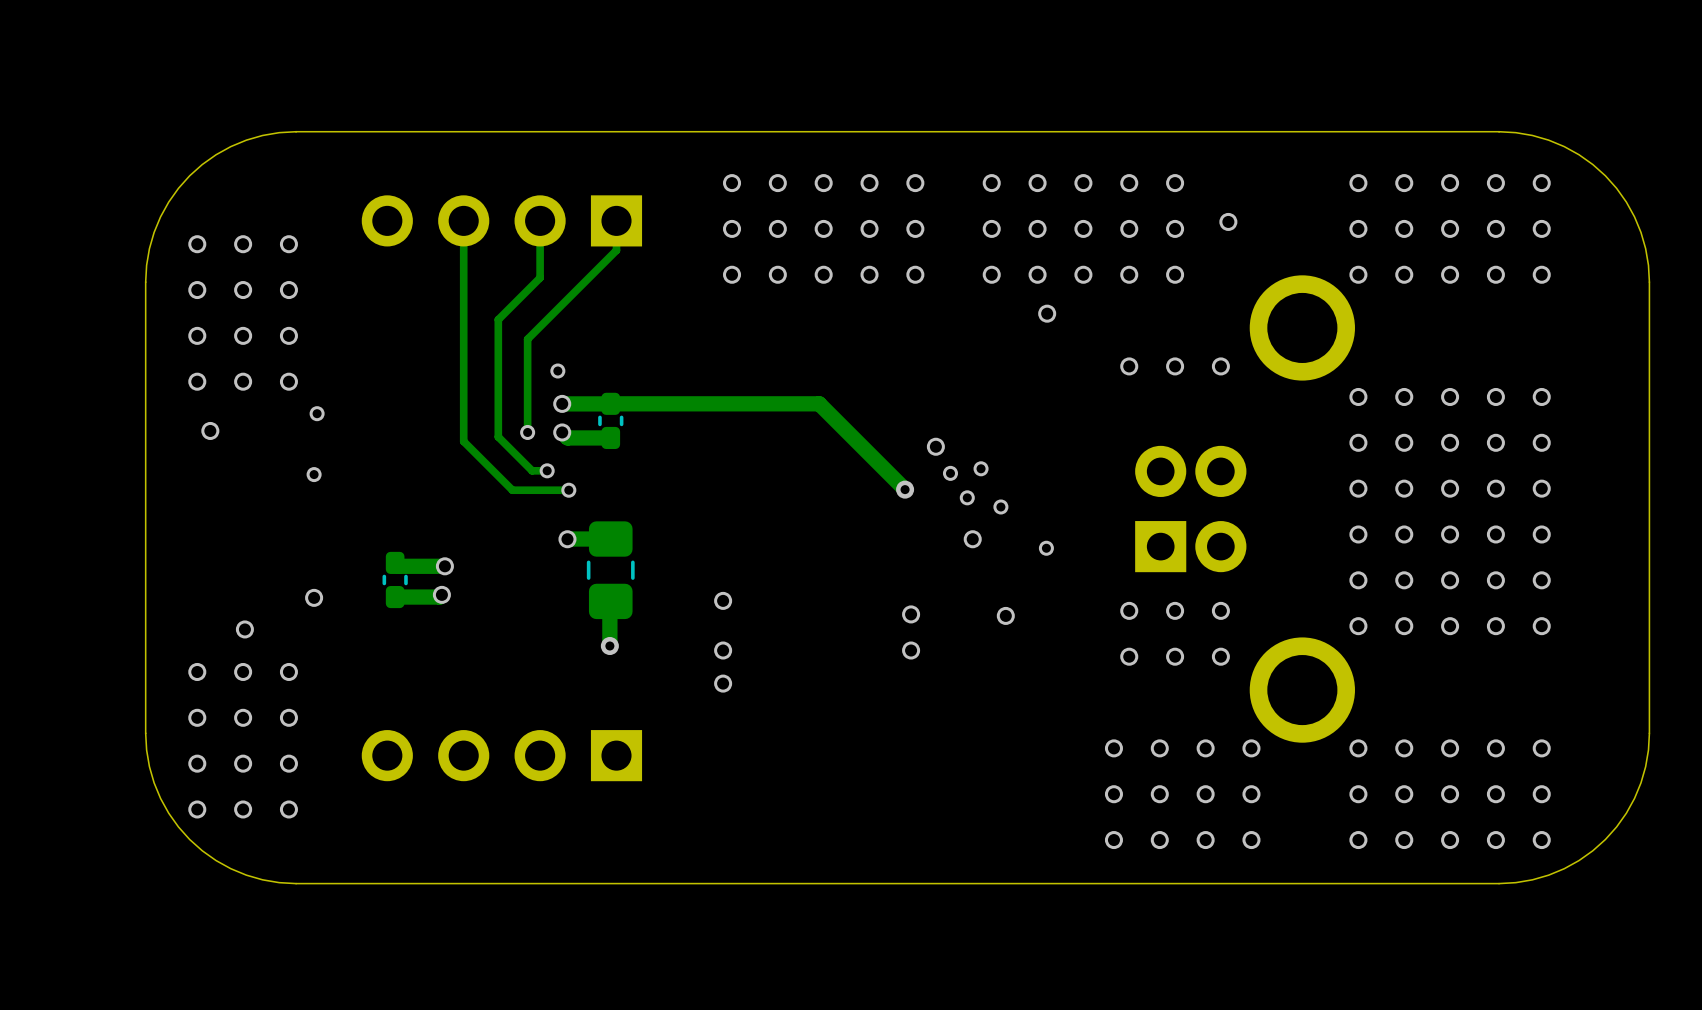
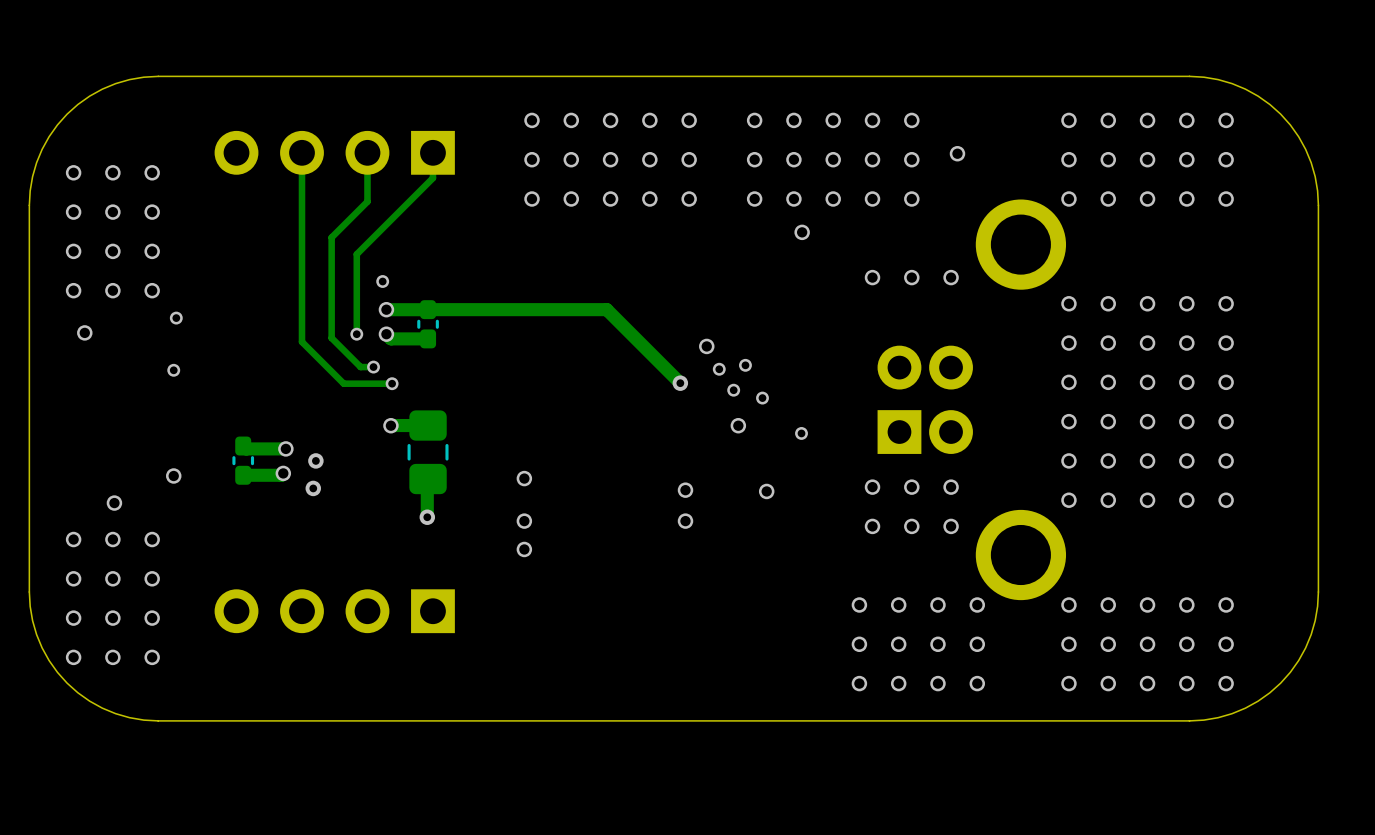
via: none -> (315, 460)
via: none -> (313, 488)

